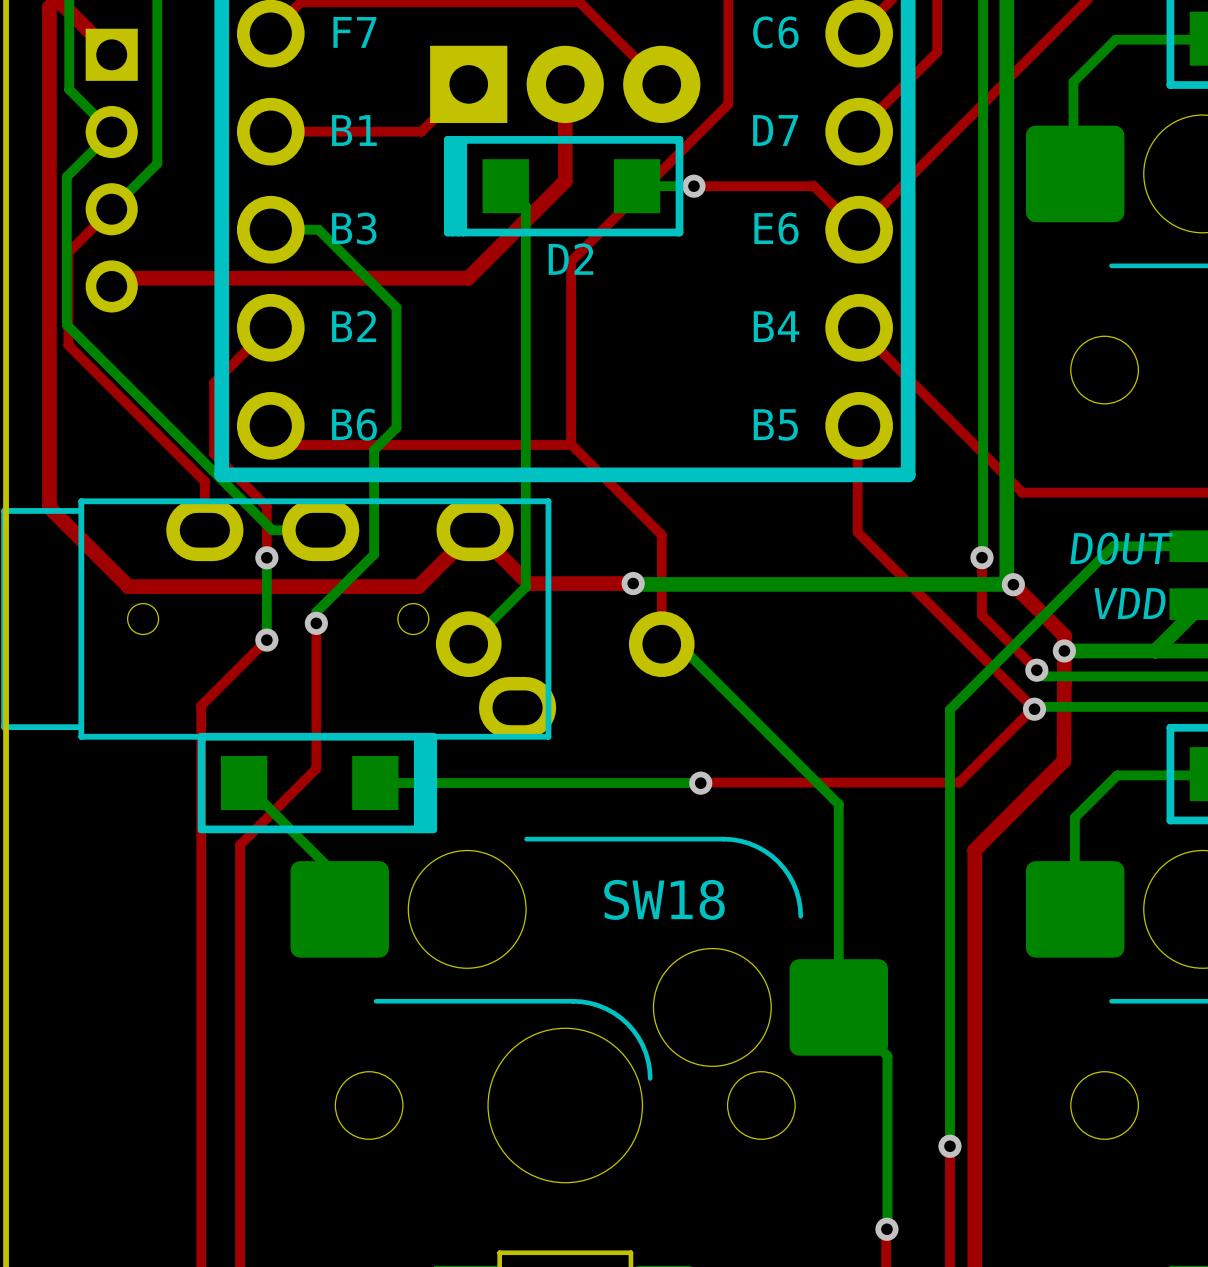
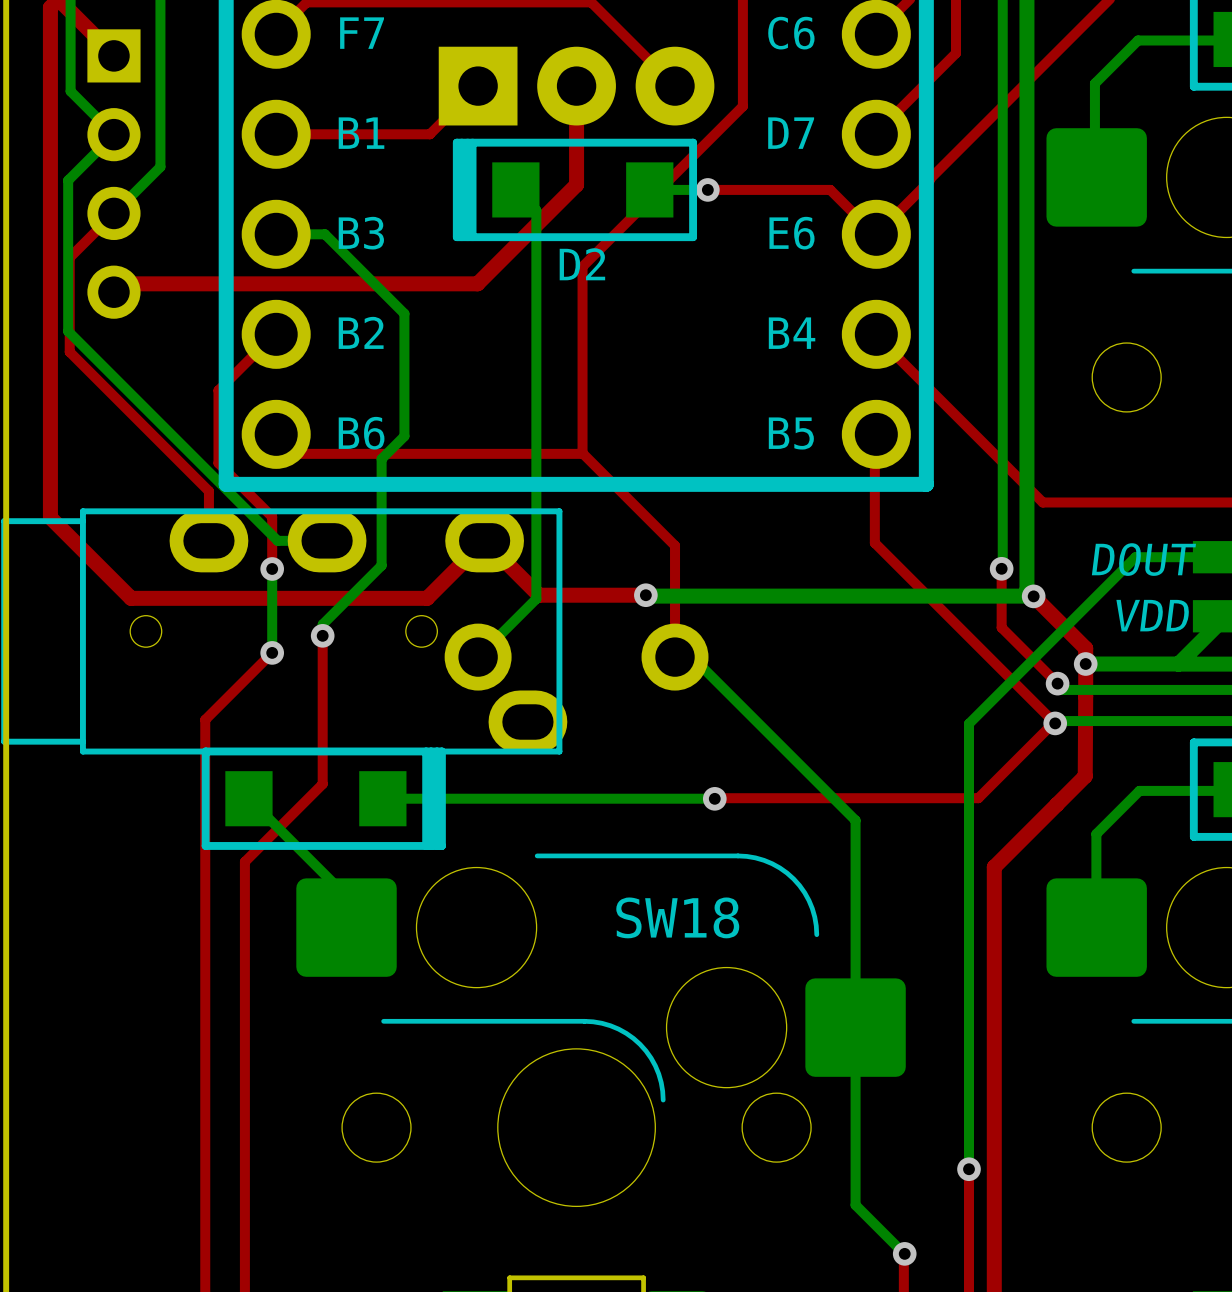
bottom track: (838, 1007) (887, 1056) (887, 1228) -> (855, 1027) (855, 1205) (904, 1253)

